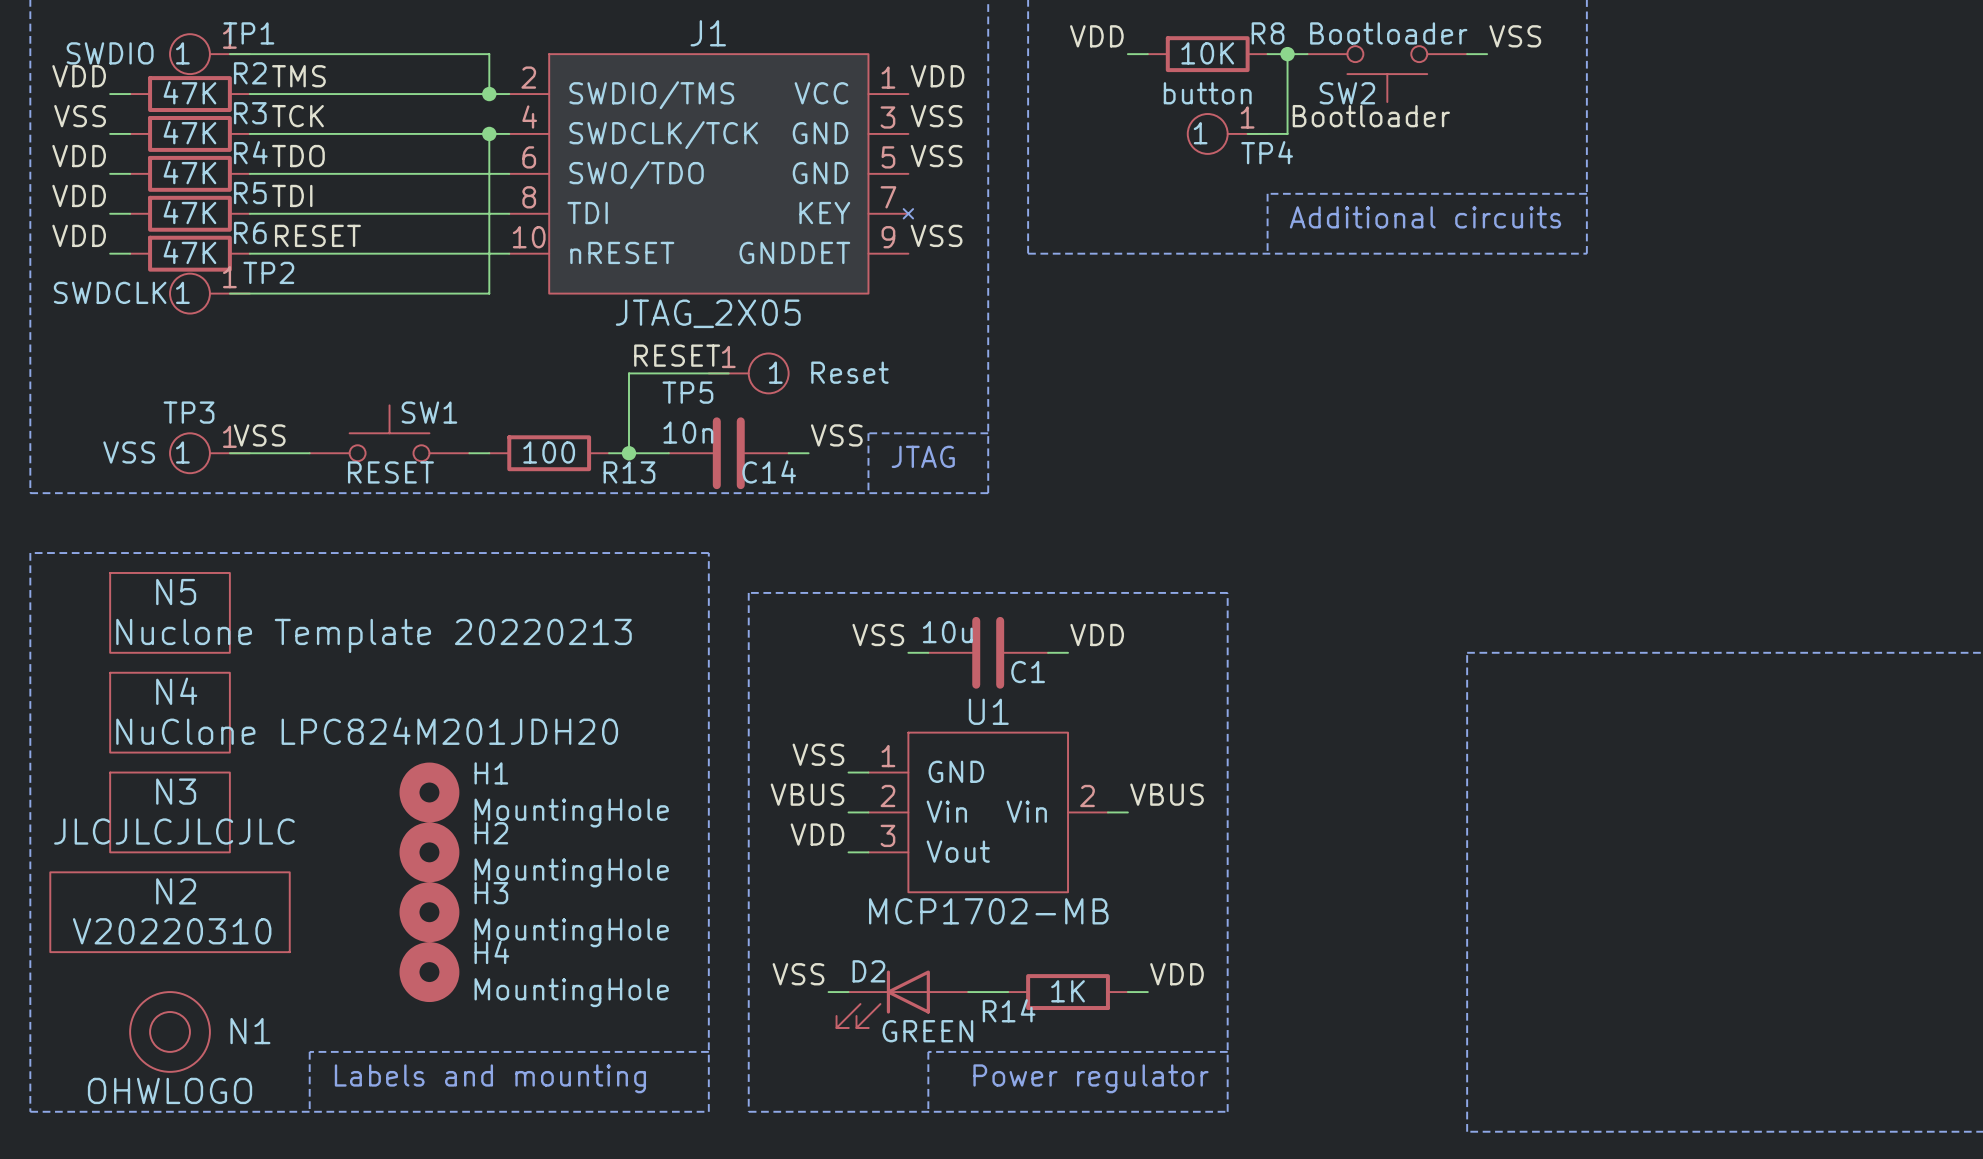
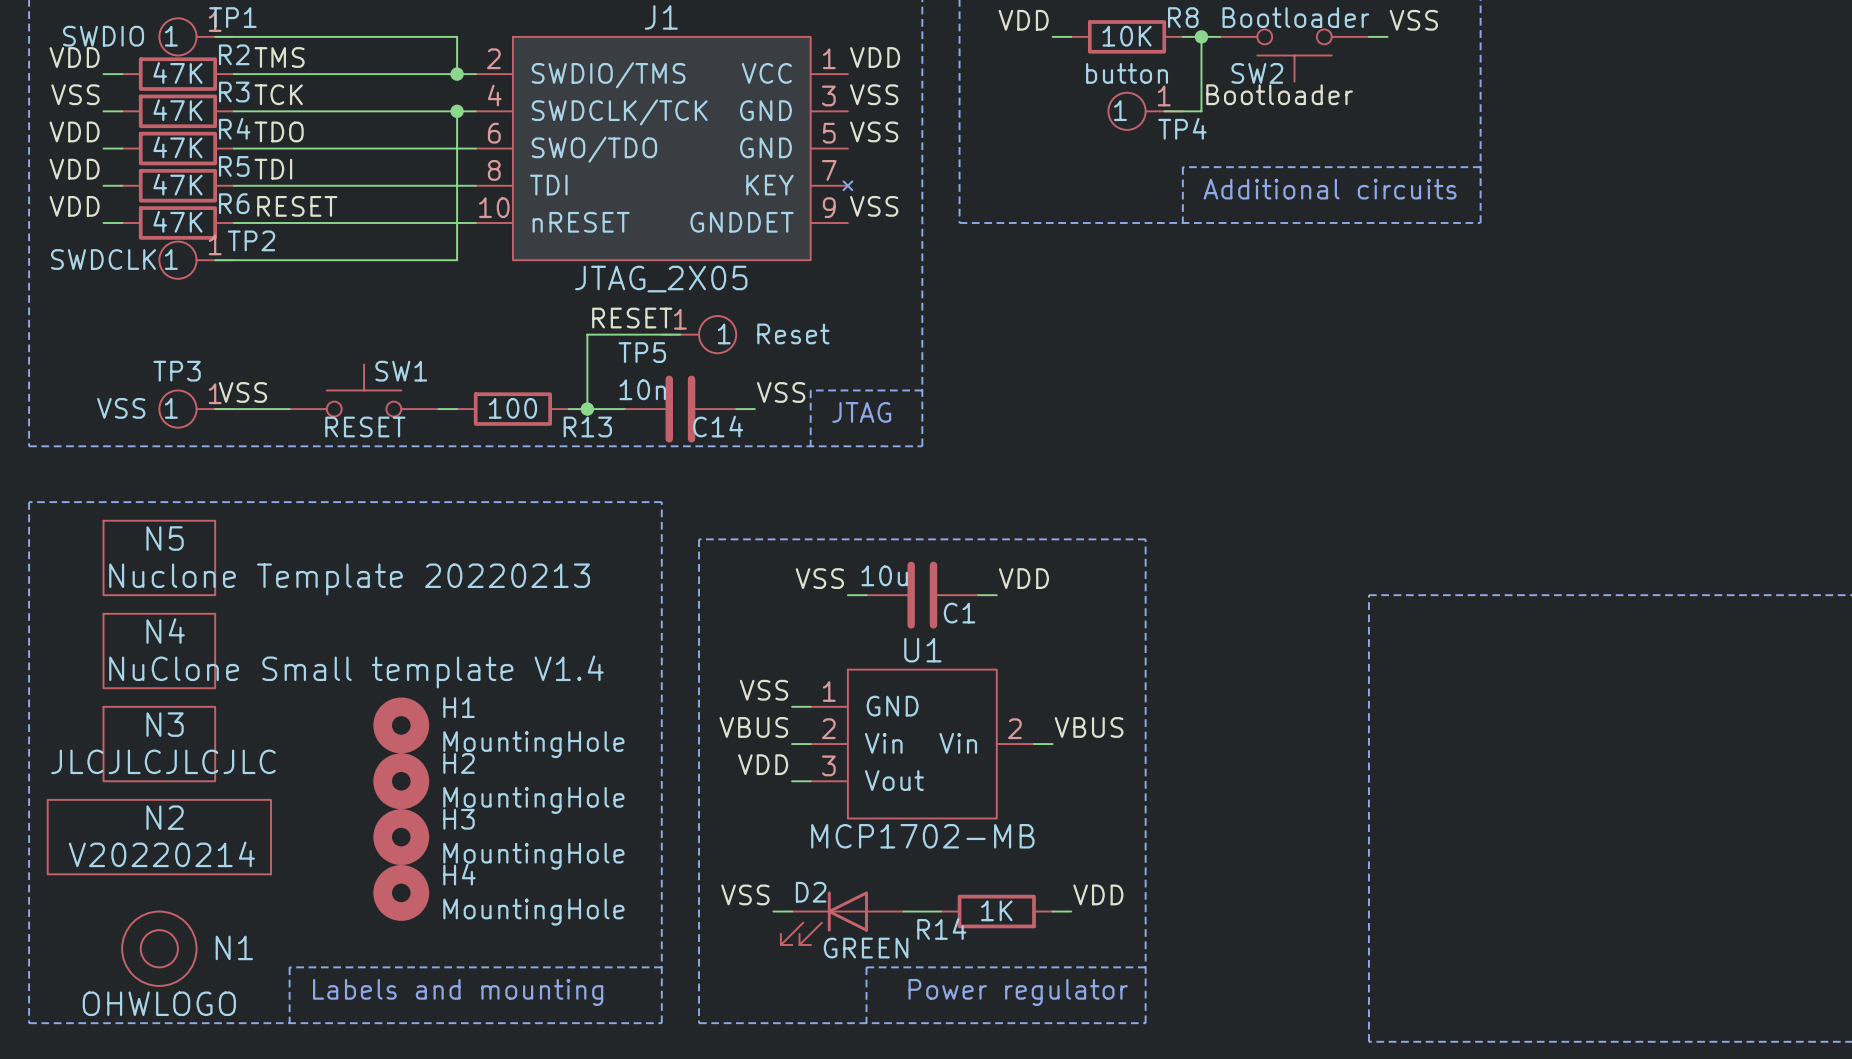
N4 value: NuClone LPC824M201JDH20 (367, 731) -> NuClone Small template V1.4 (356, 671)
N2 value: V20220310 (172, 931) -> V20220214 (161, 854)

